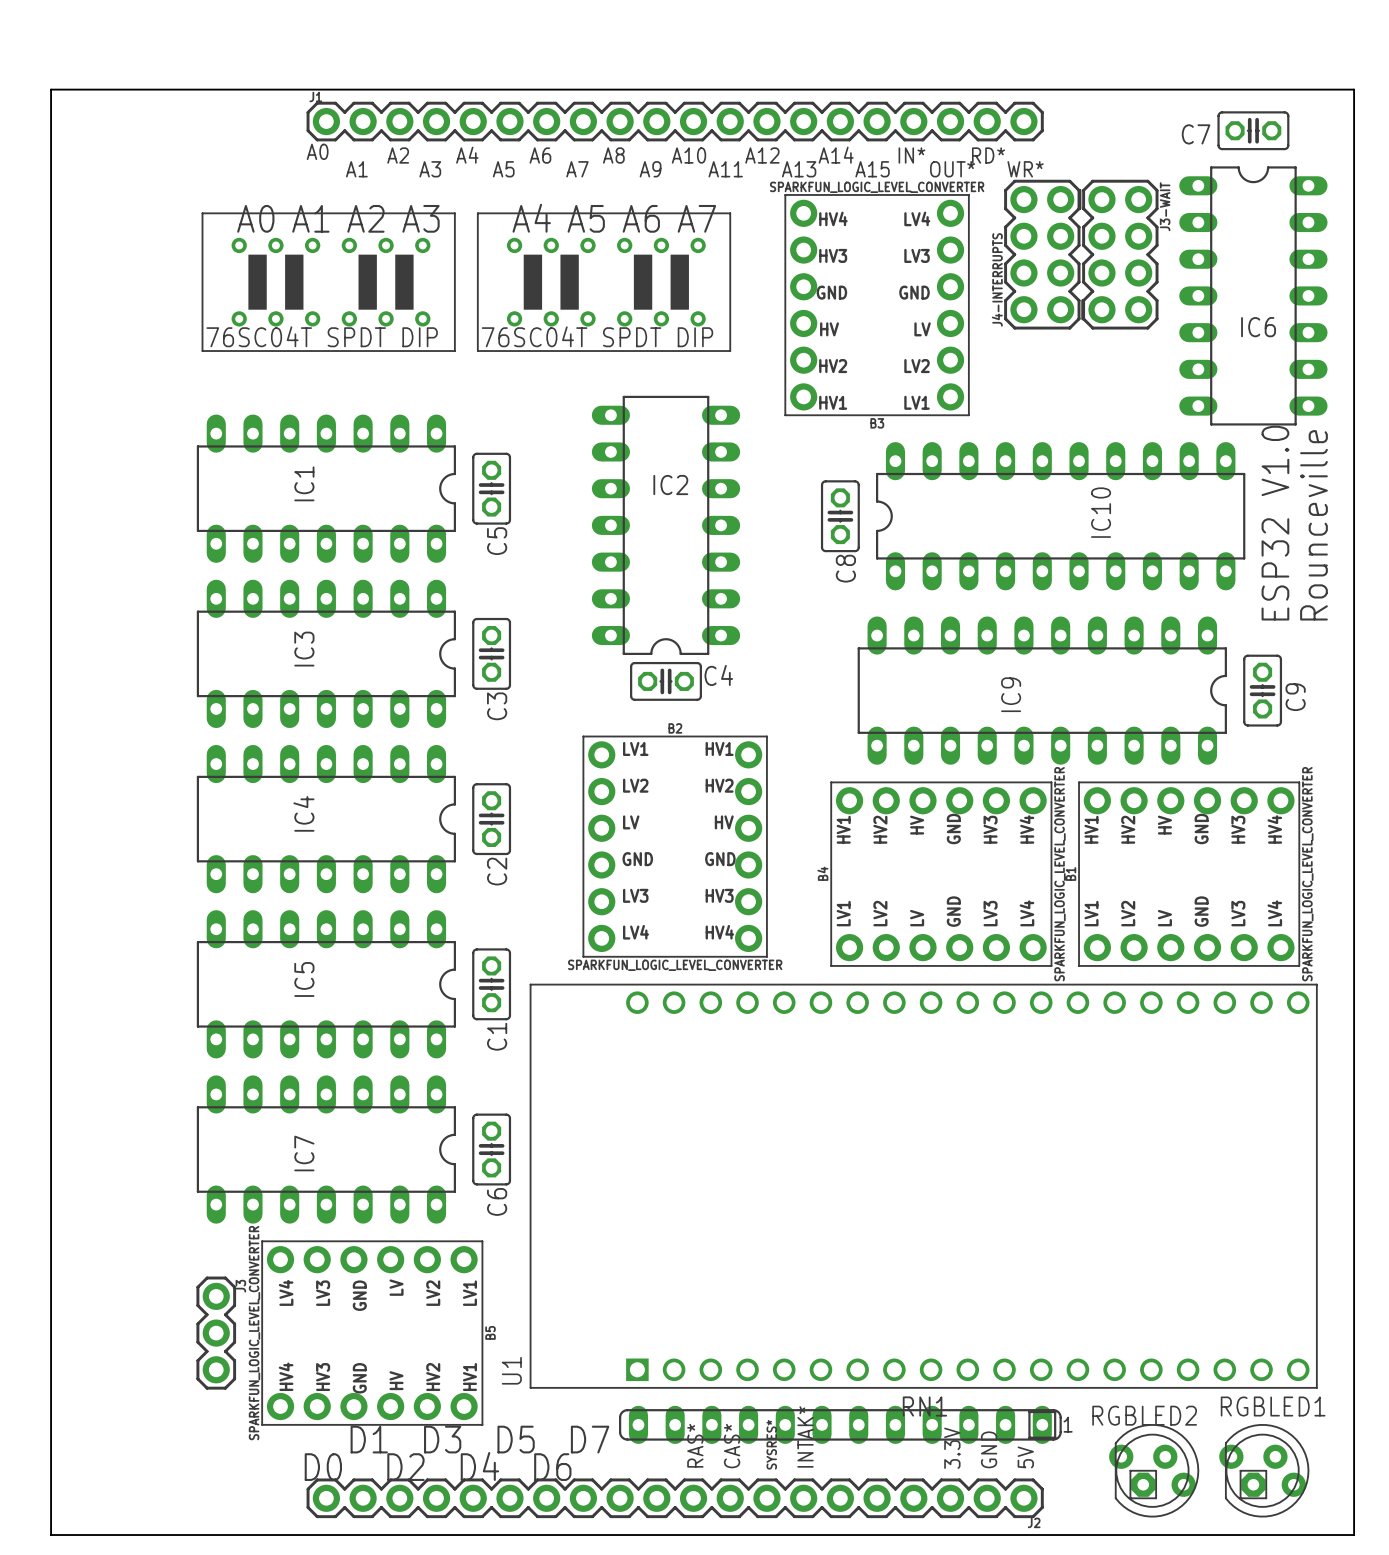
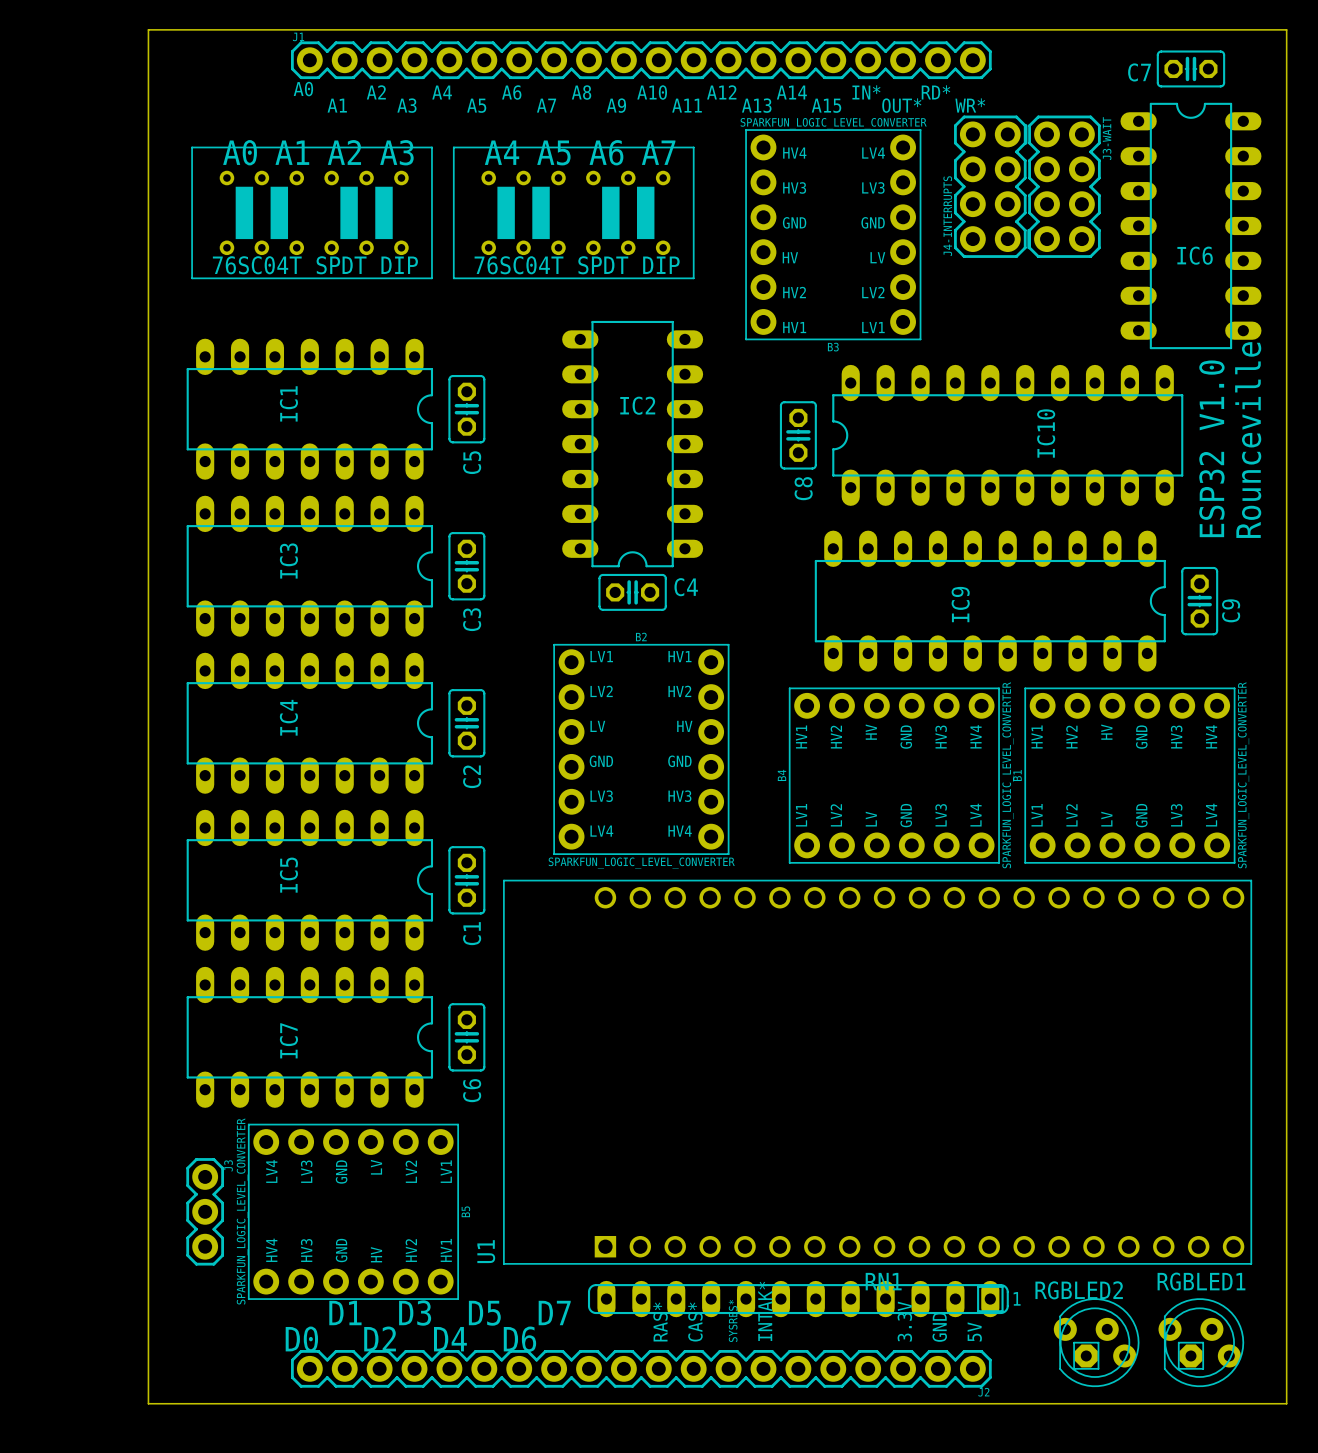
board edge: (156, 89) (51, 89) (51, 1535) (156, 1535) -> (148, 29) (148, 1403)

